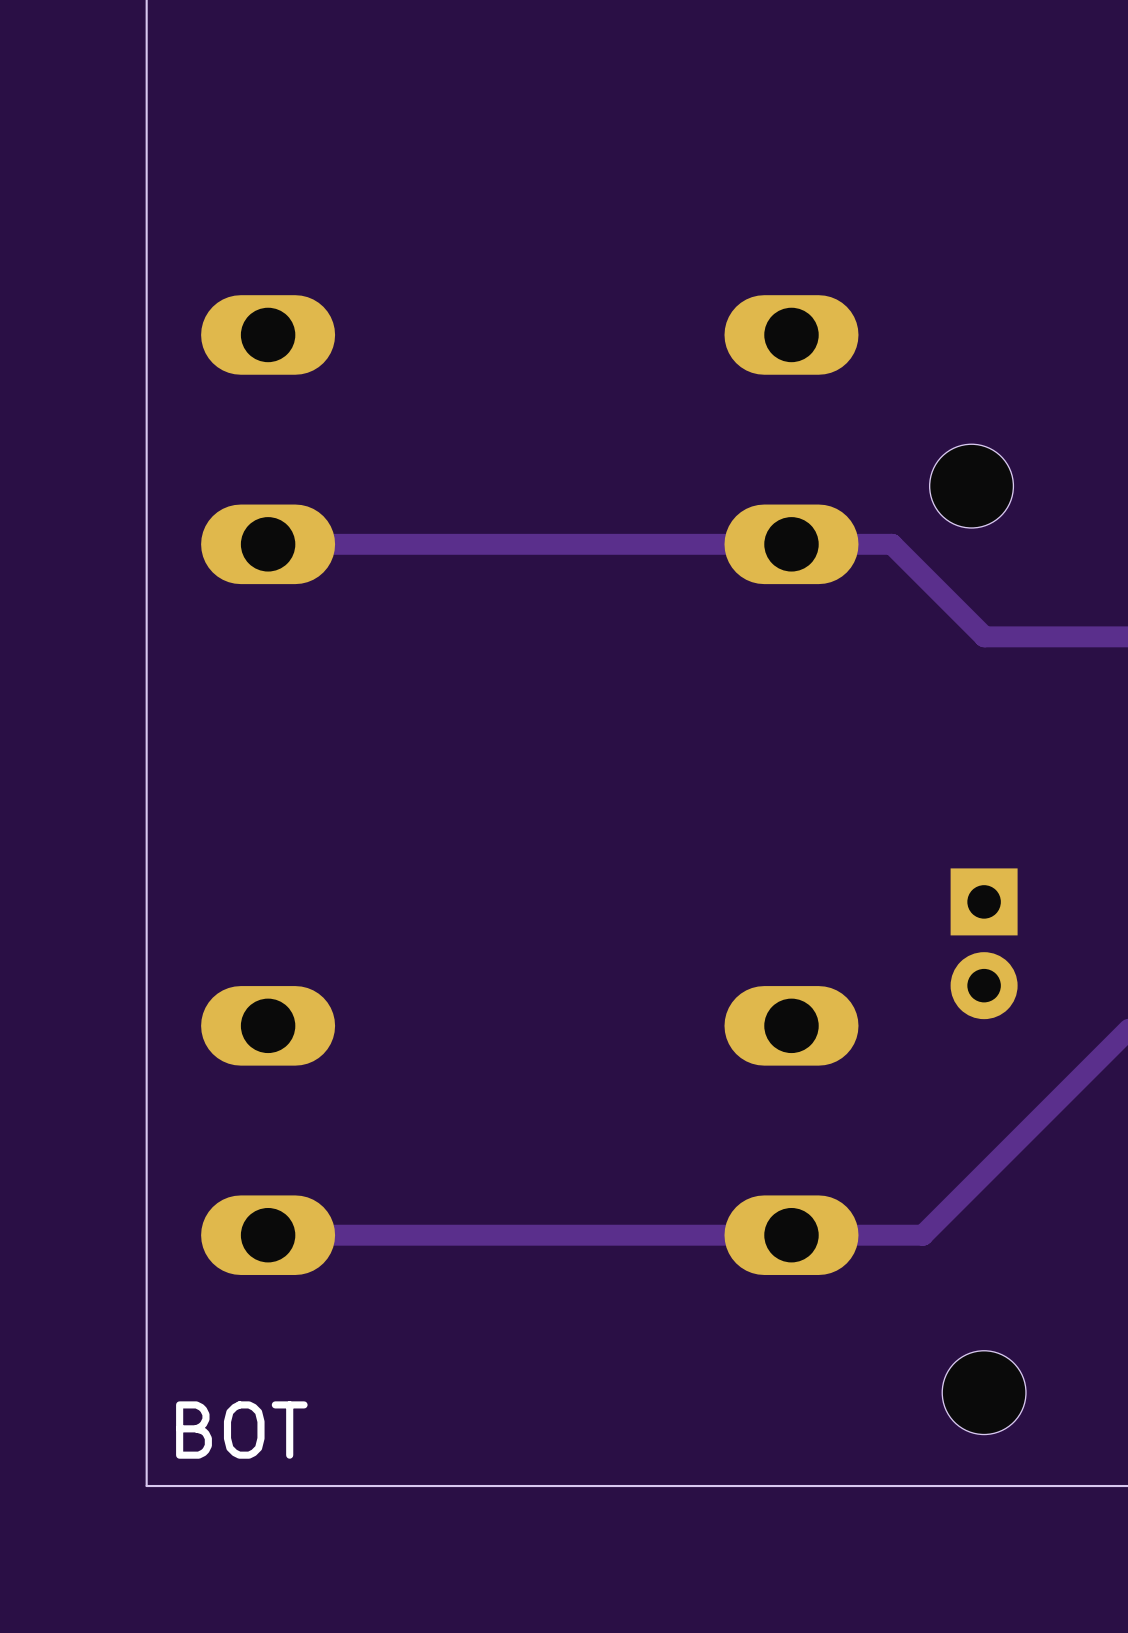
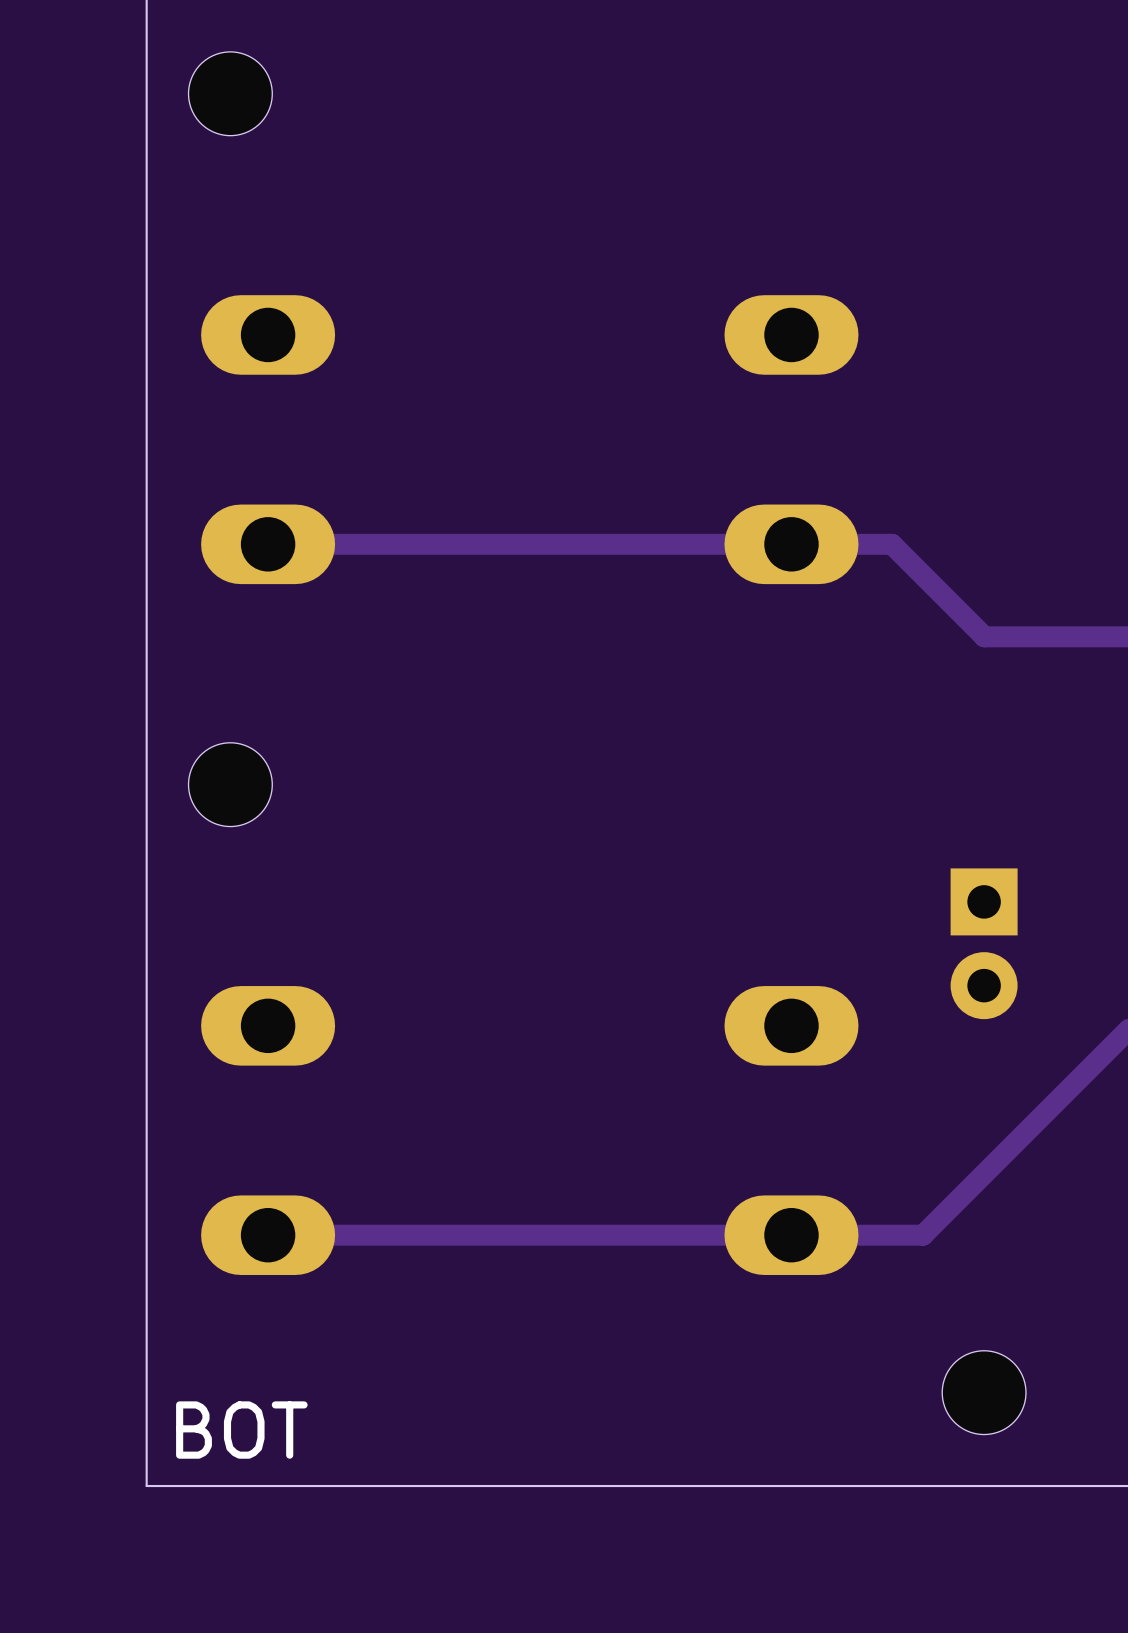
part: none -> (230, 93)
part: (971, 486) -> none
part: none -> (230, 784)

